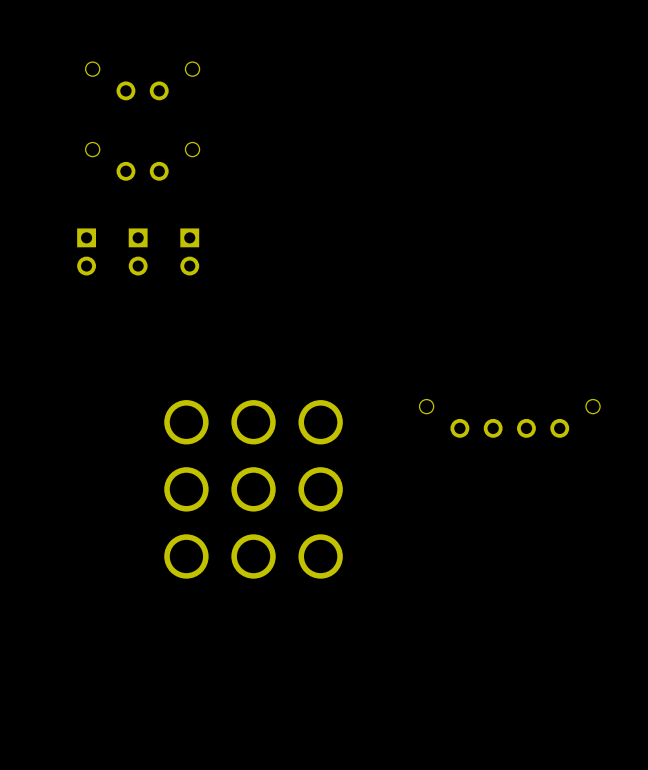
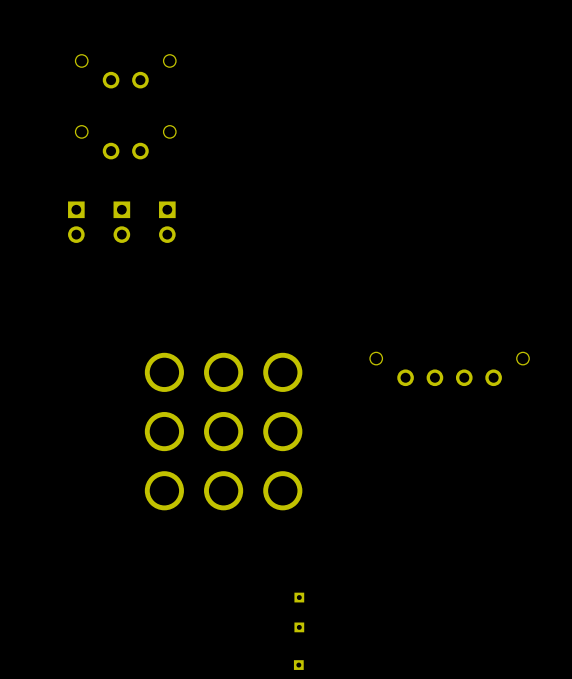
part: none -> (299, 597)
part: none -> (299, 627)
part: none -> (298, 665)

